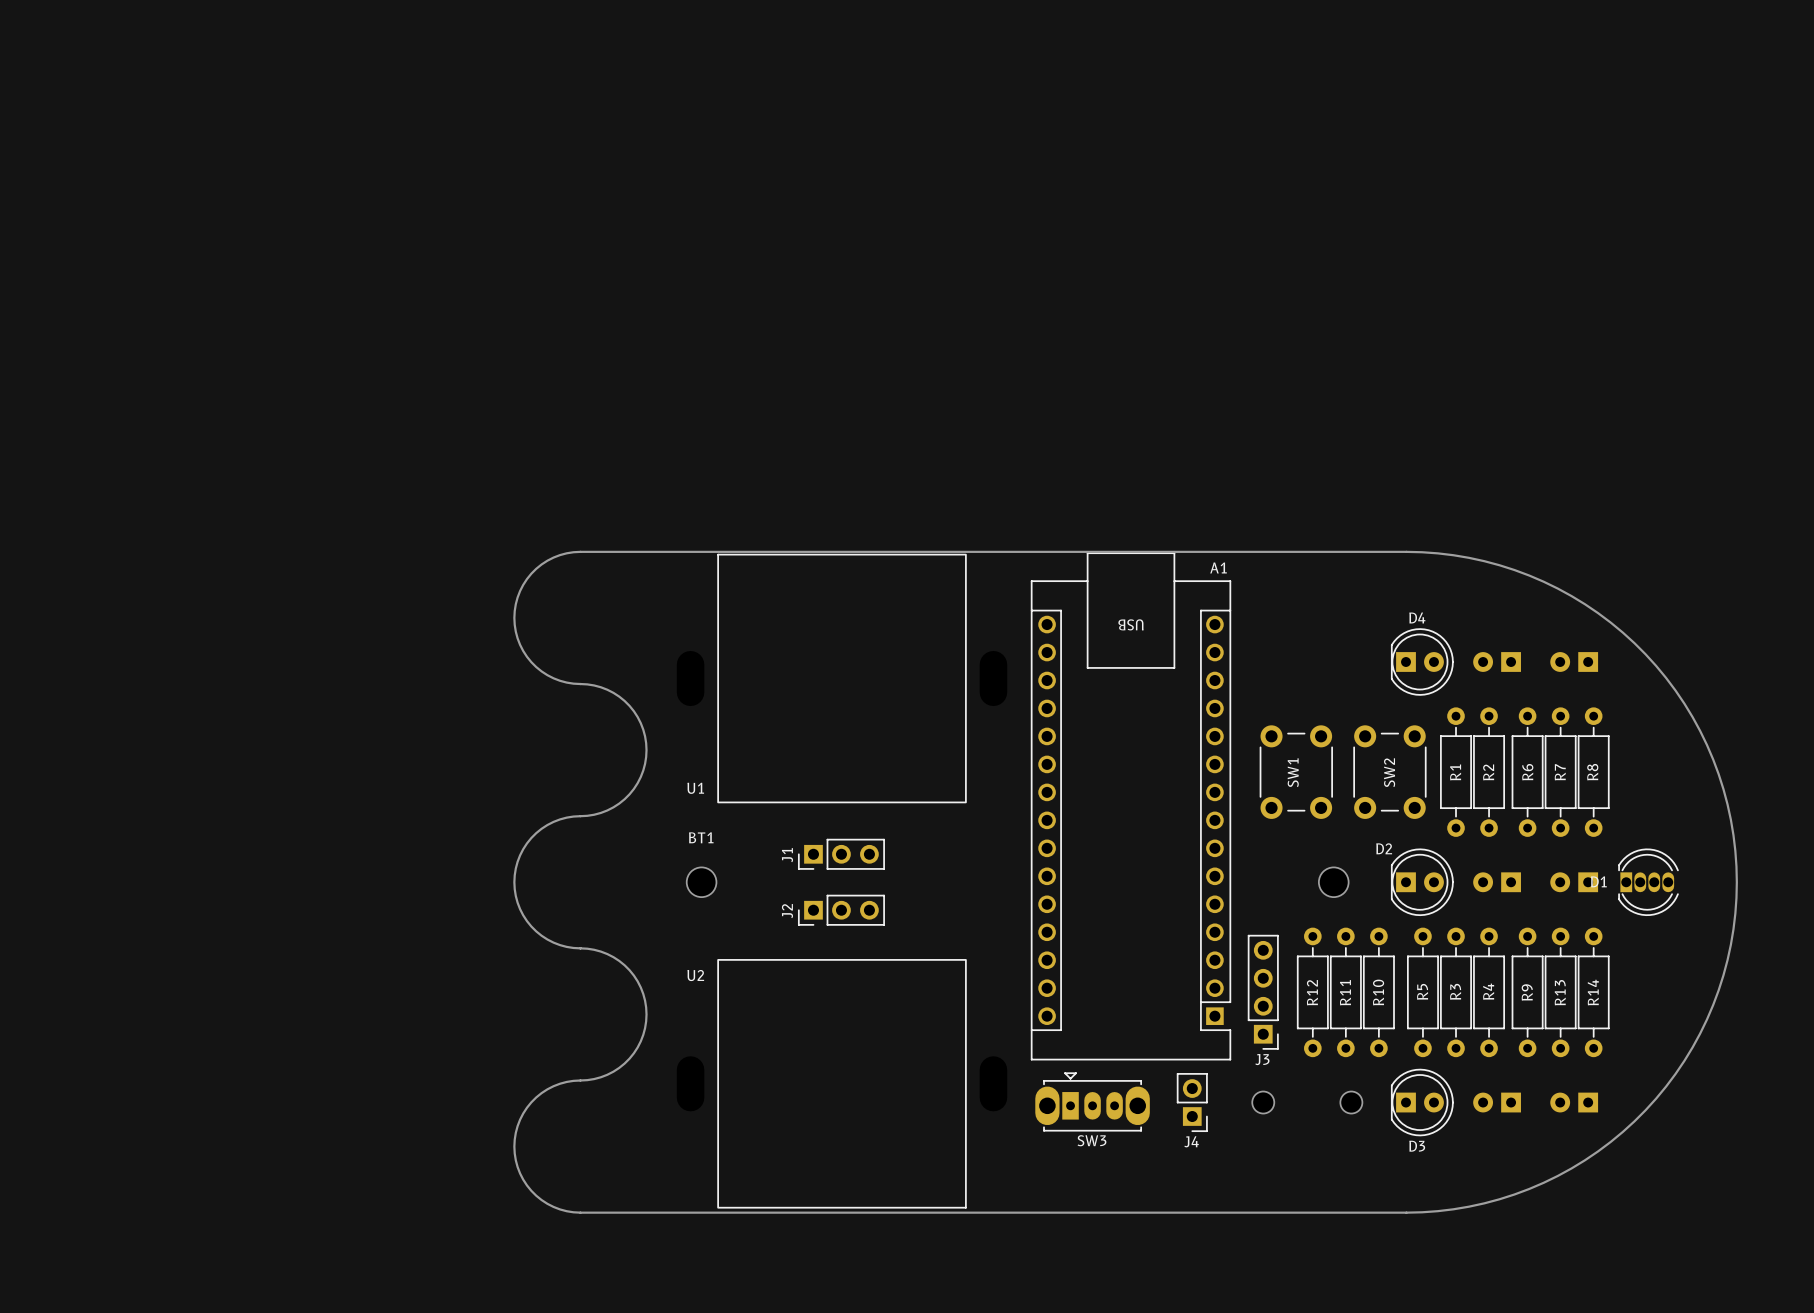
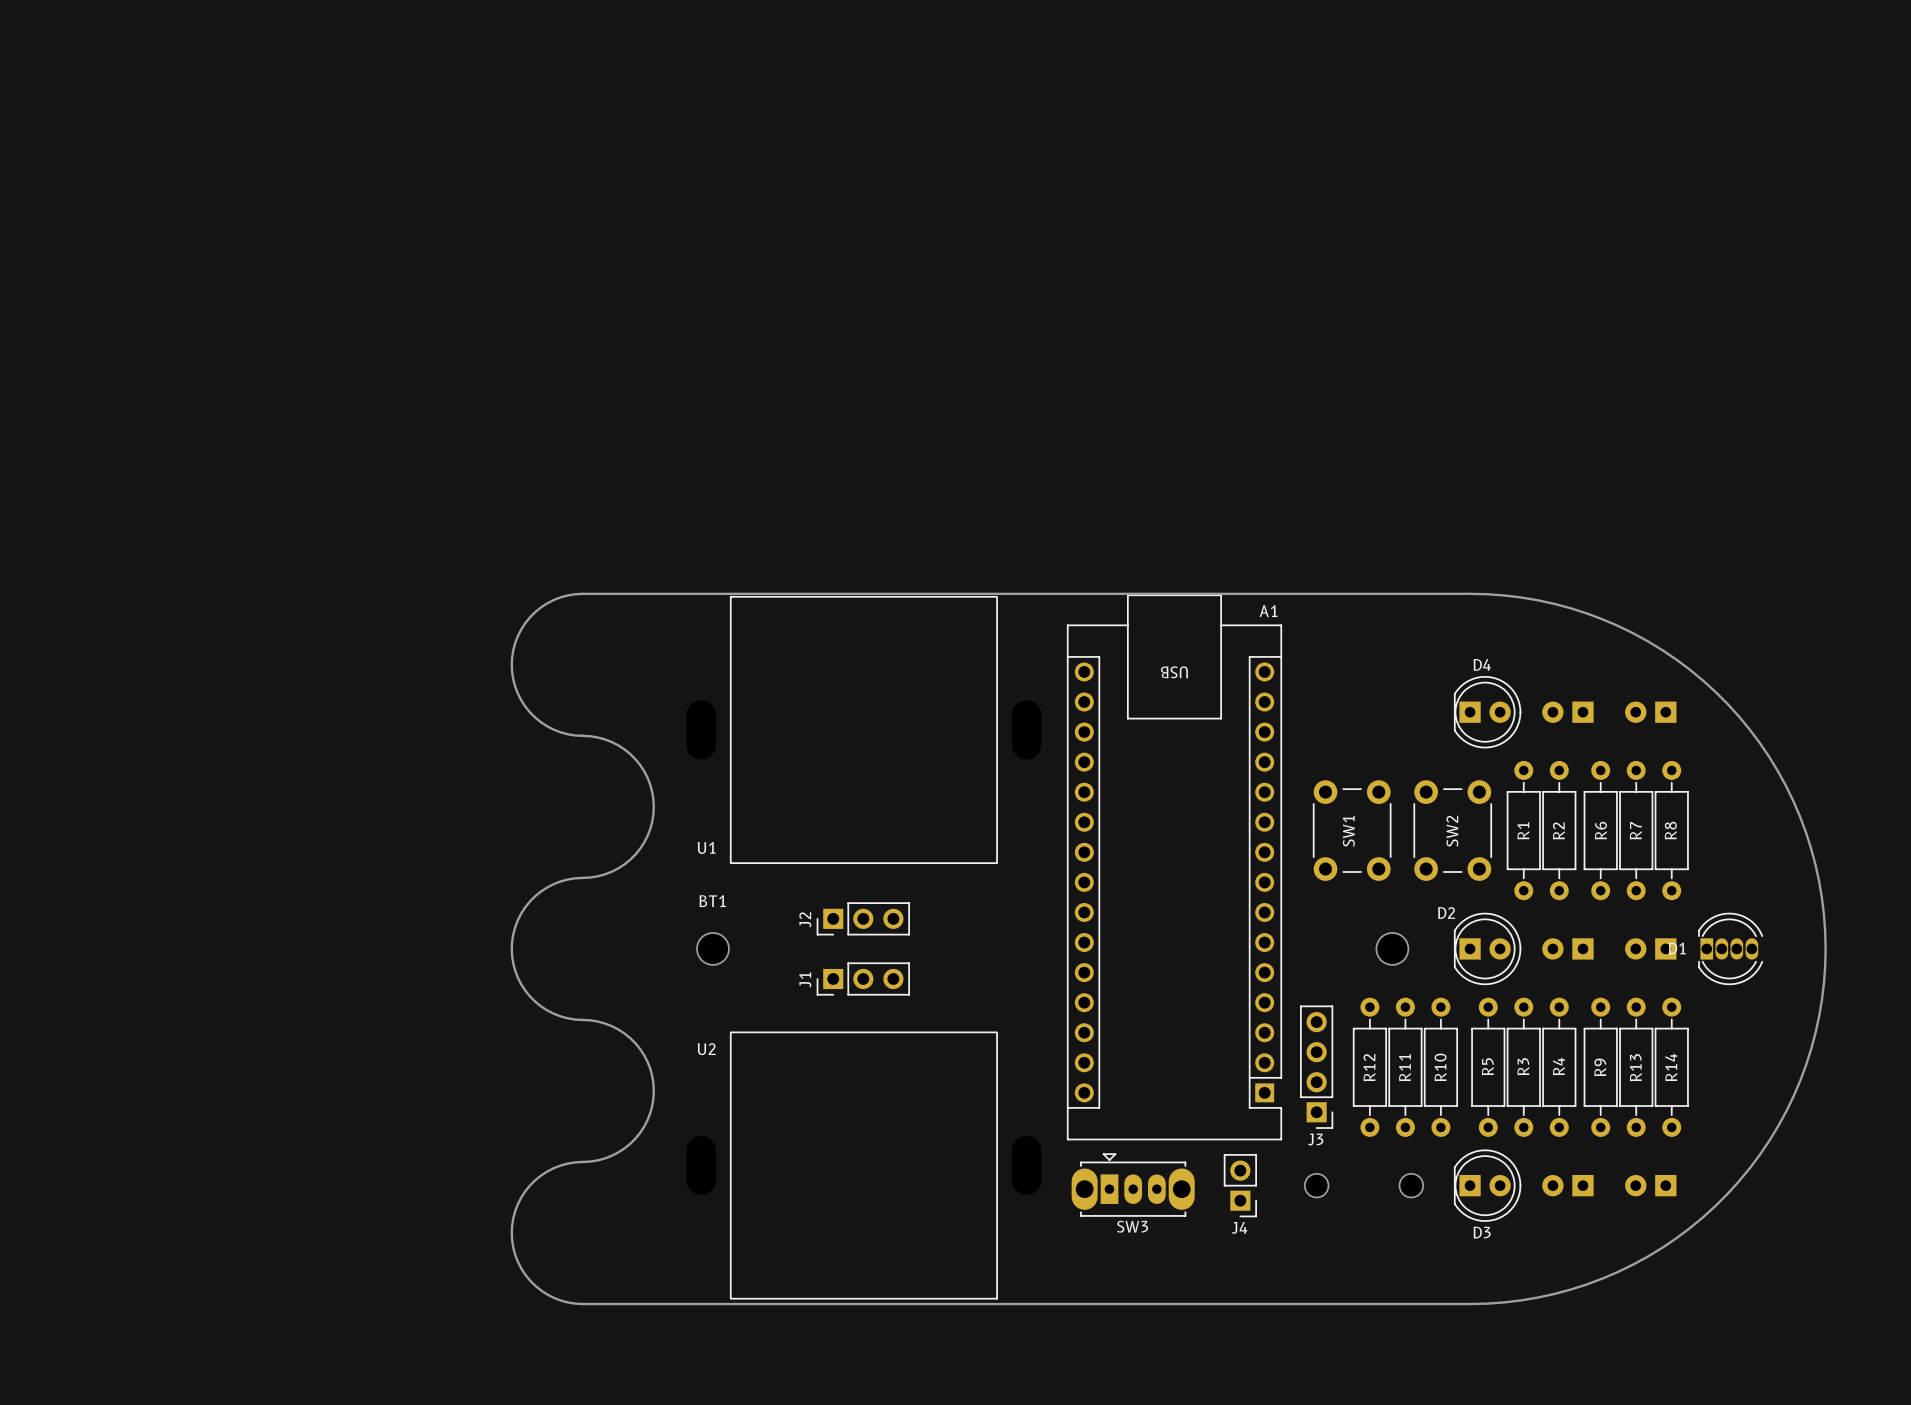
J1 name: J1 (787, 855) -> J2 (805, 919)
J2 name: J2 (787, 911) -> J1 (805, 979)

